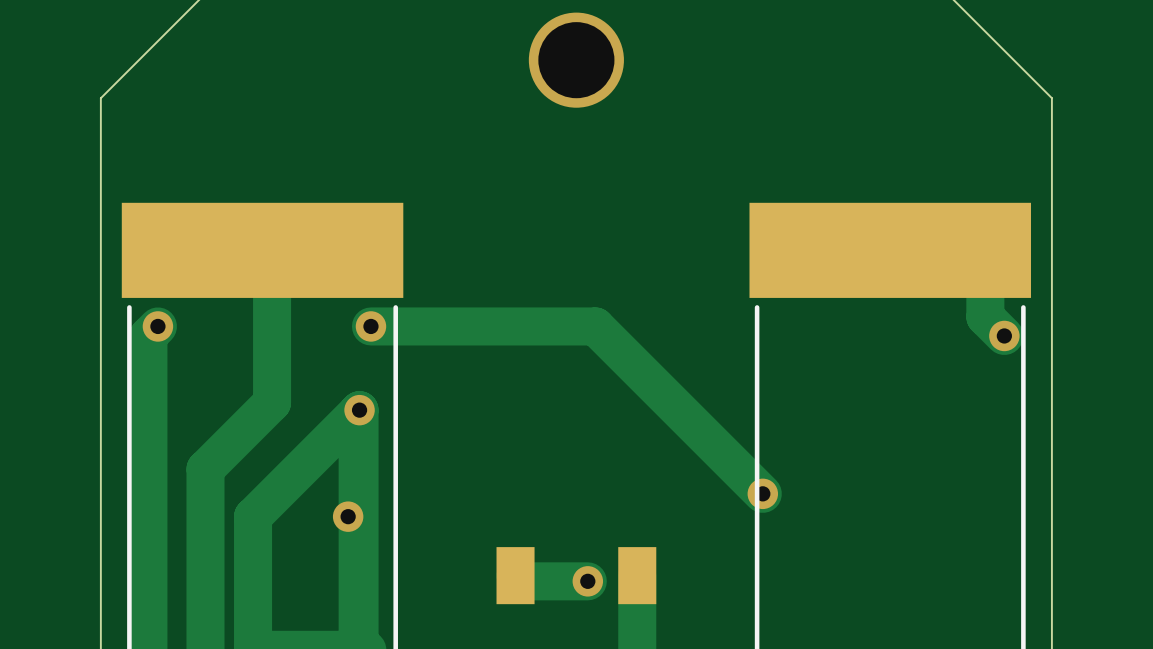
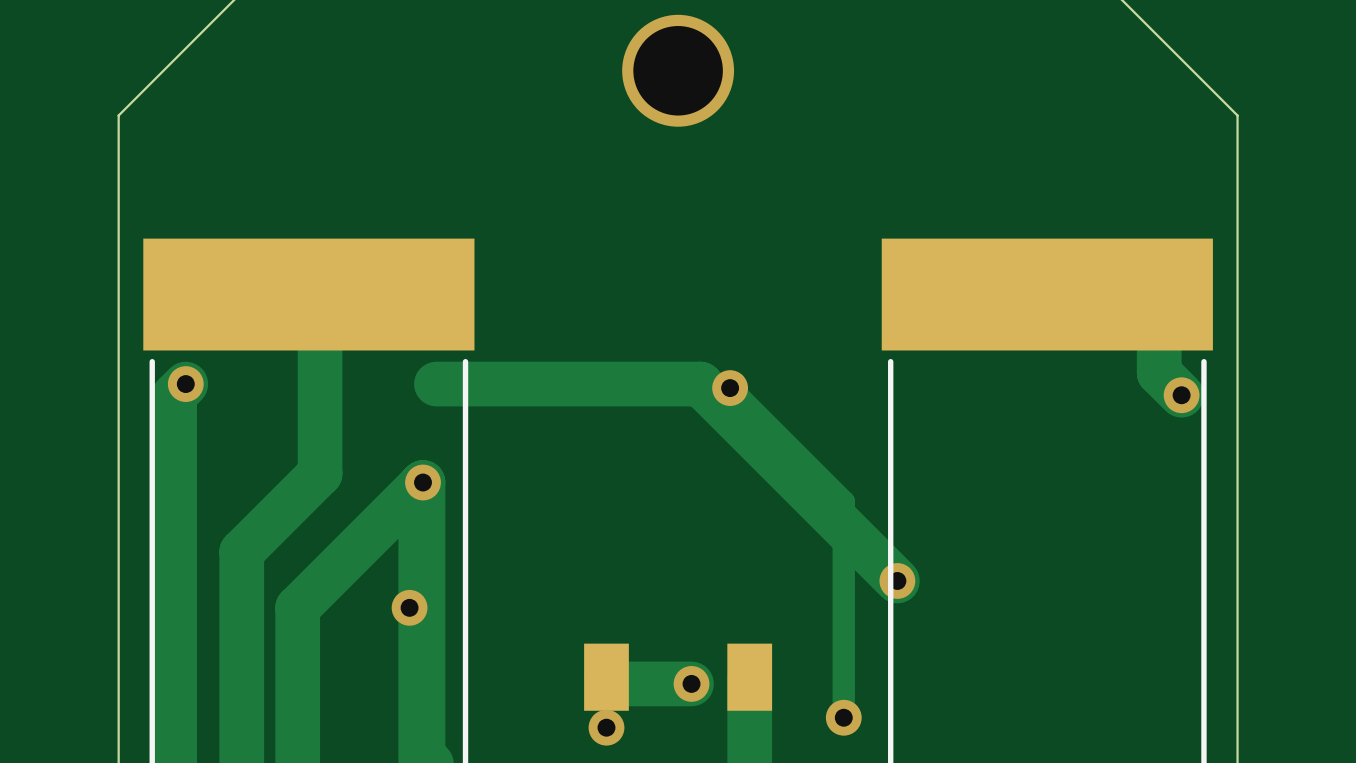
via: (370, 326) -> none
track: none -> (730, 388) (843, 501) (843, 717)
via: none -> (730, 388)
via: none -> (843, 717)
via: none -> (606, 727)

